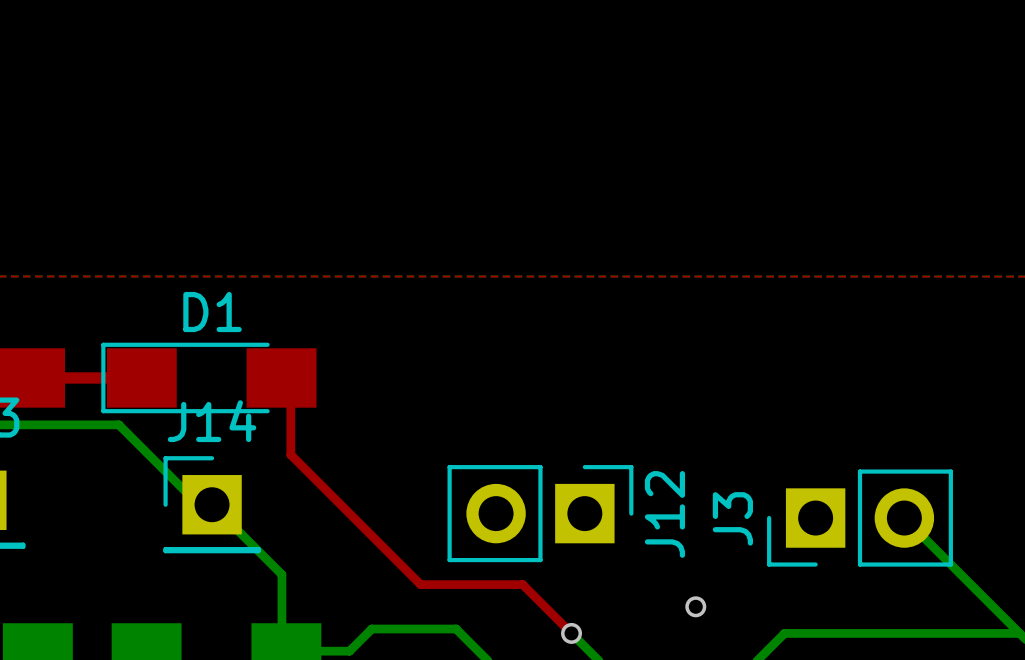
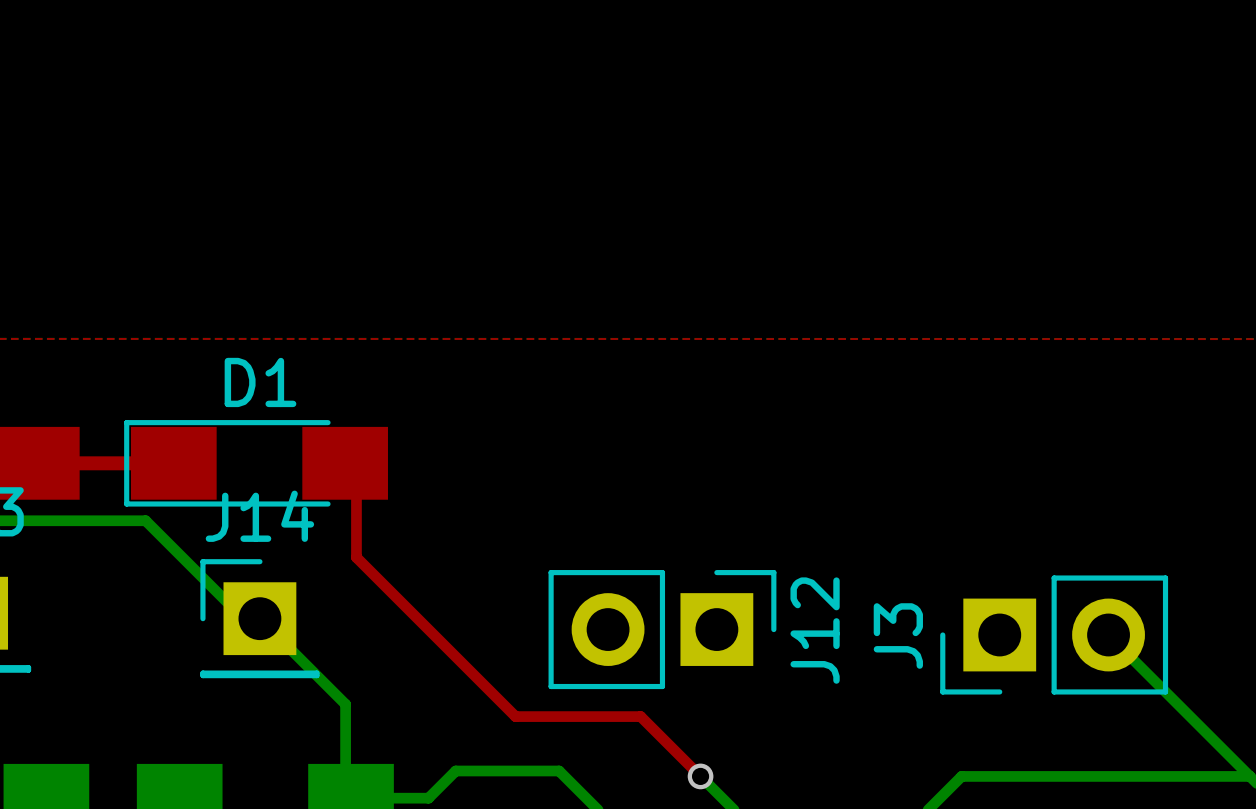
via: (695, 606) -> none

